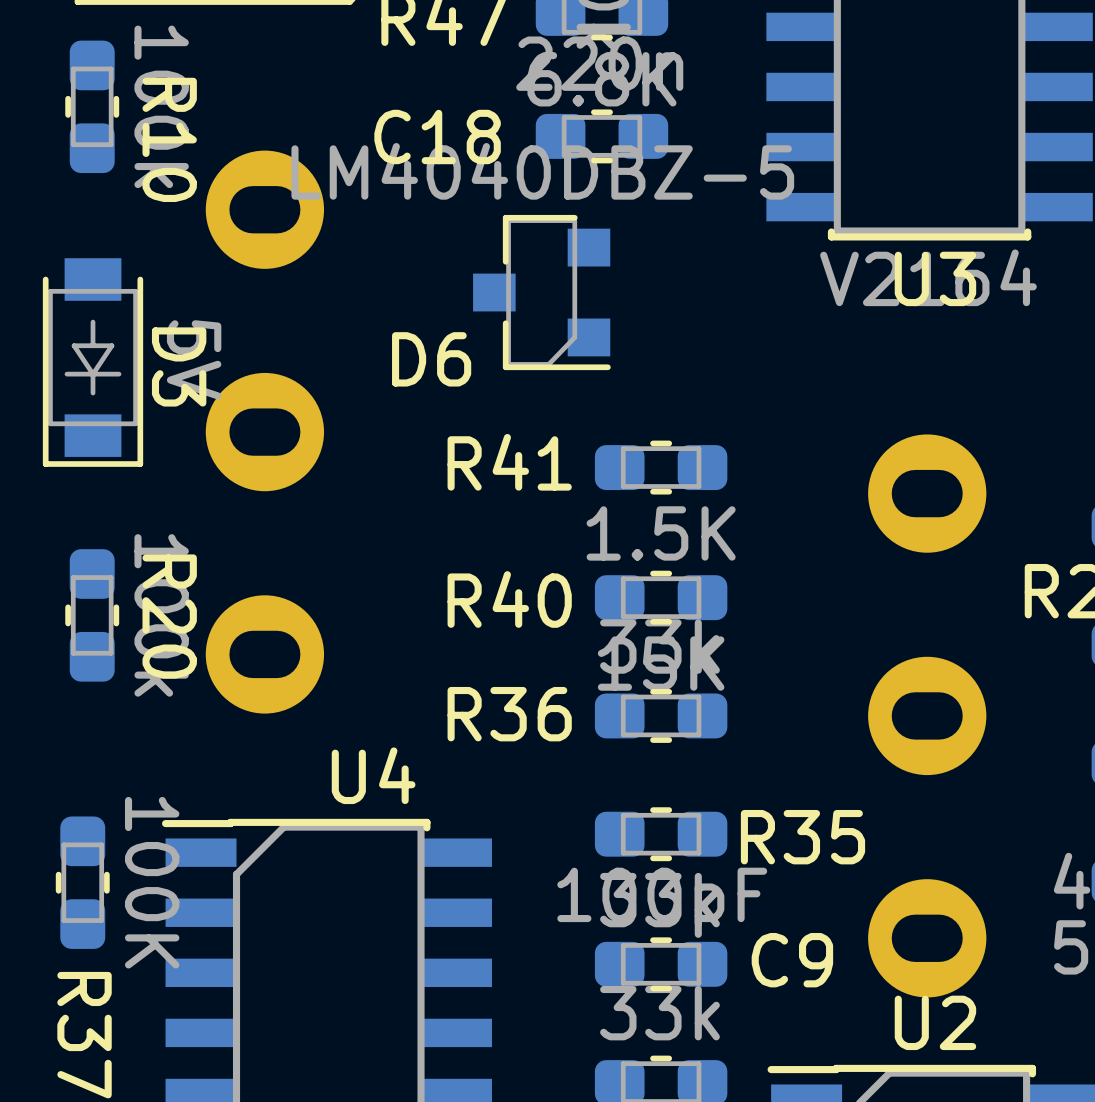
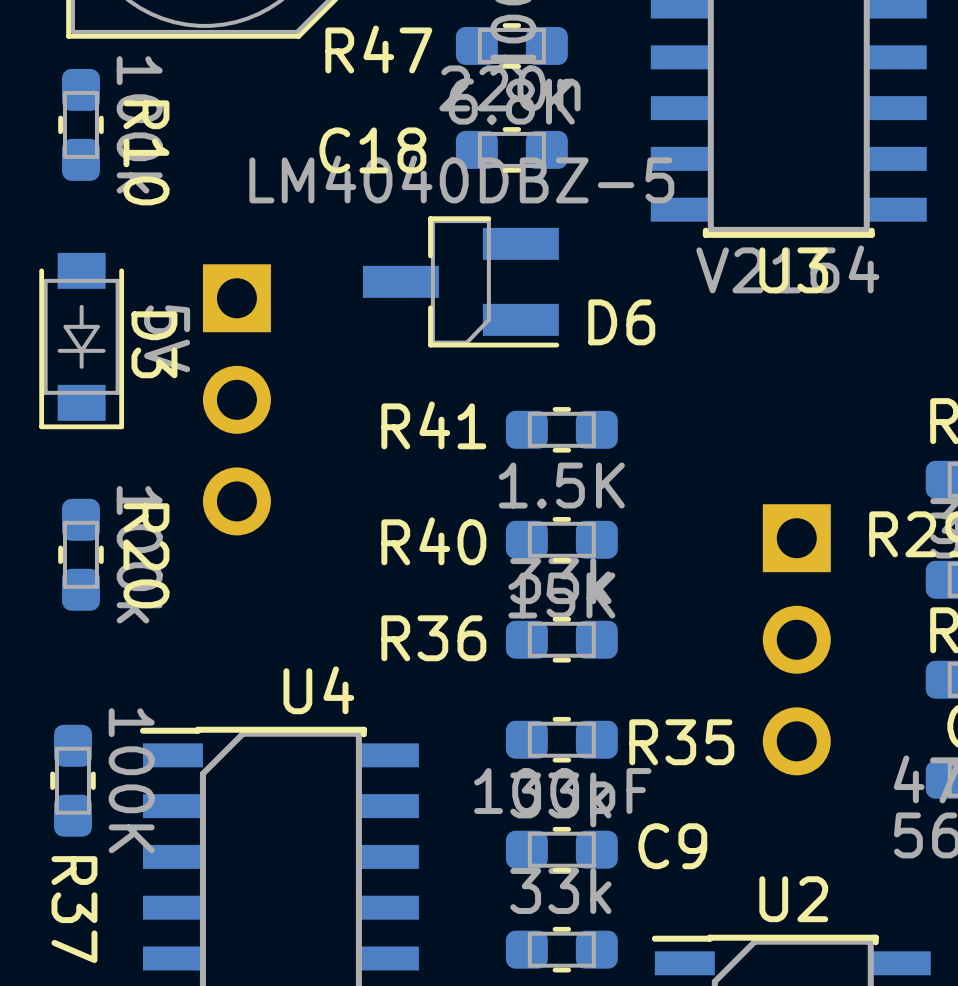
part footprint: [205, 150, 325, 714] -> [202, 264, 271, 536]
D6 footprint: [473, 214, 611, 371] -> [362, 216, 560, 348]
D6 name position: D6 (431, 359) -> D6 (621, 322)
part footprint: [868, 434, 987, 998] -> [762, 504, 831, 776]

